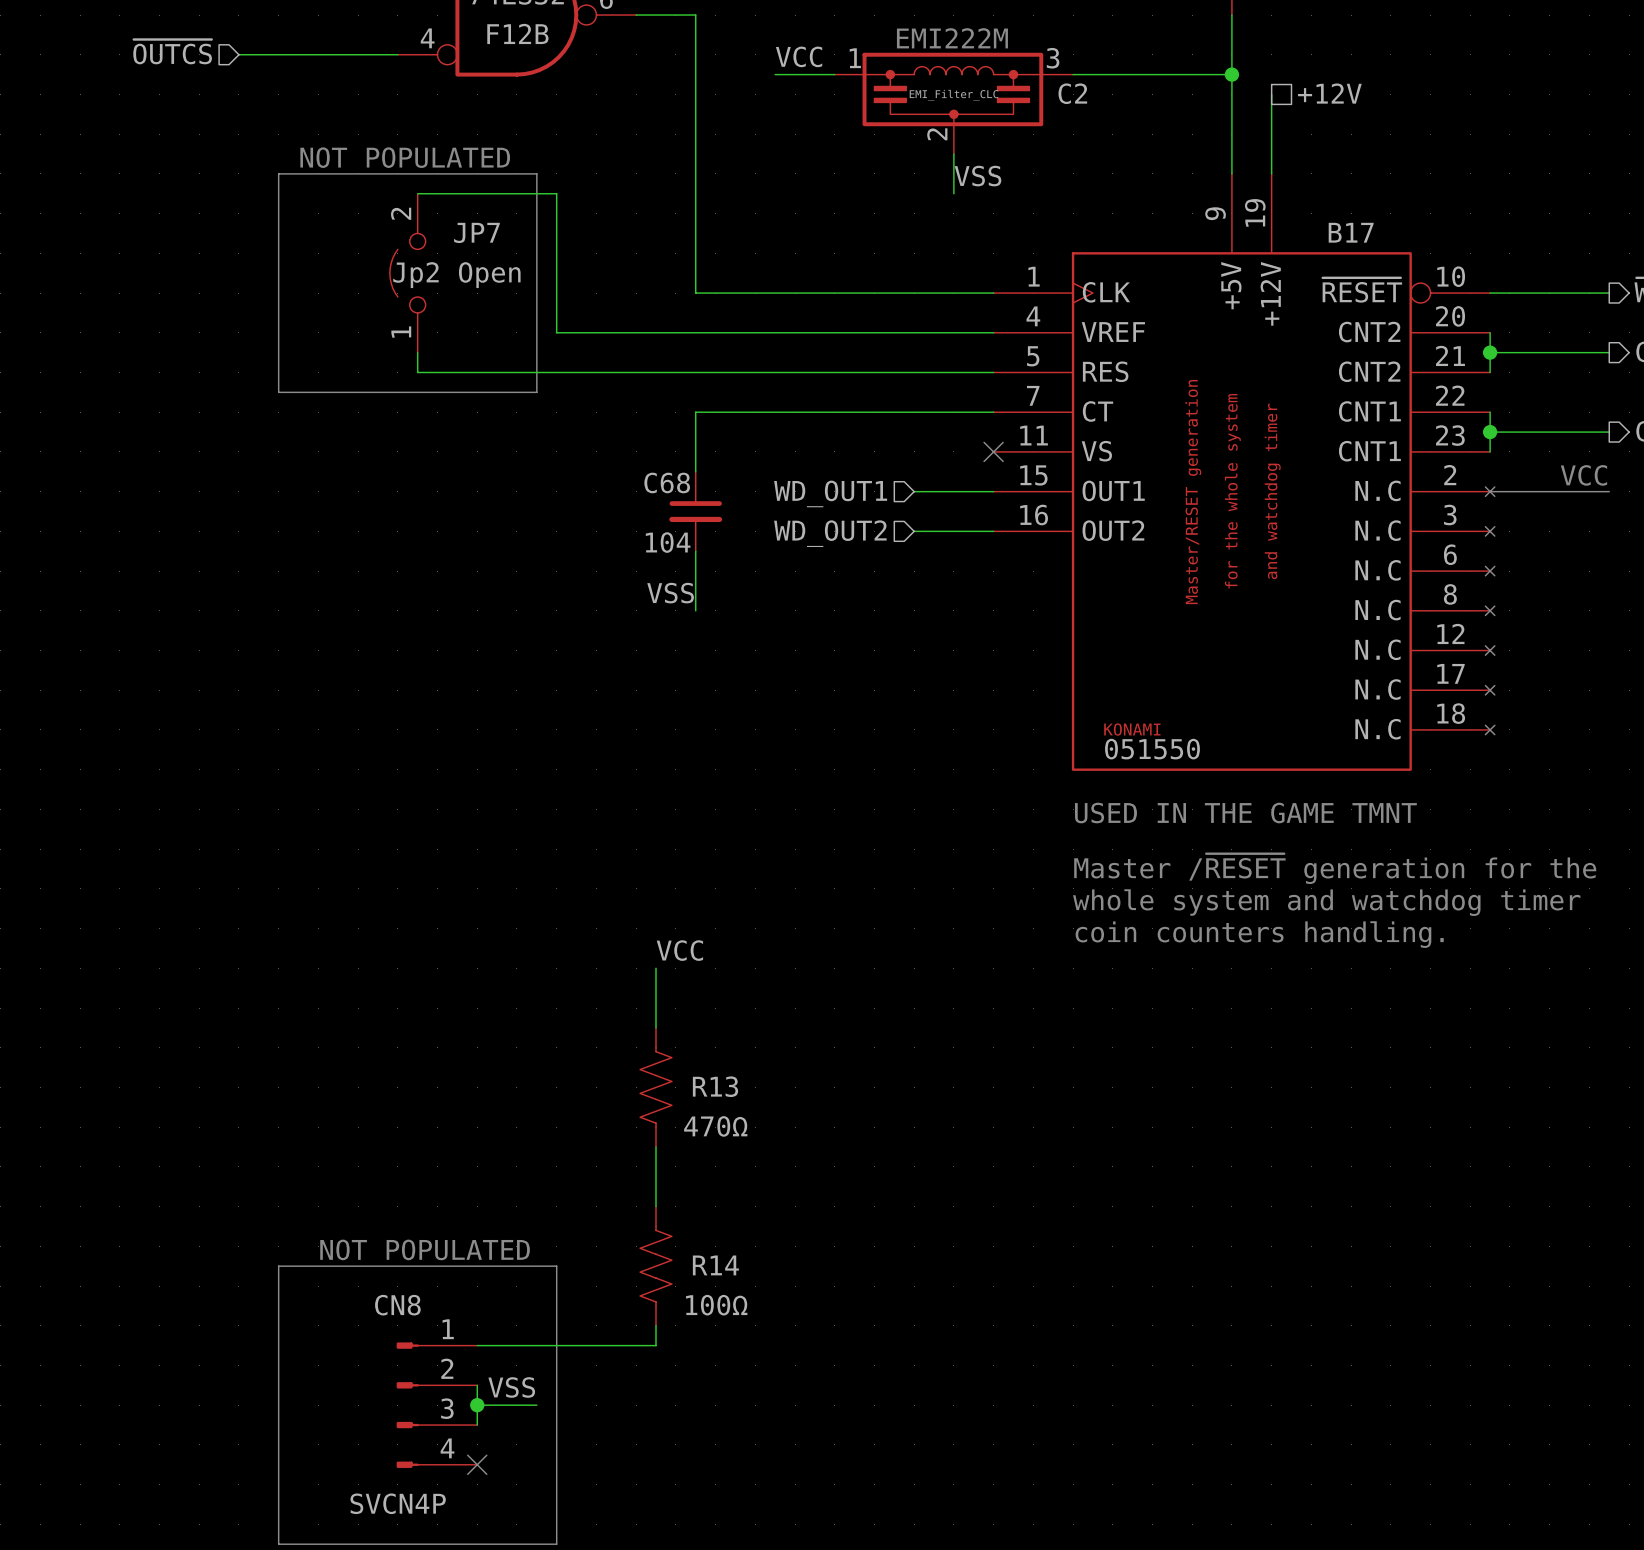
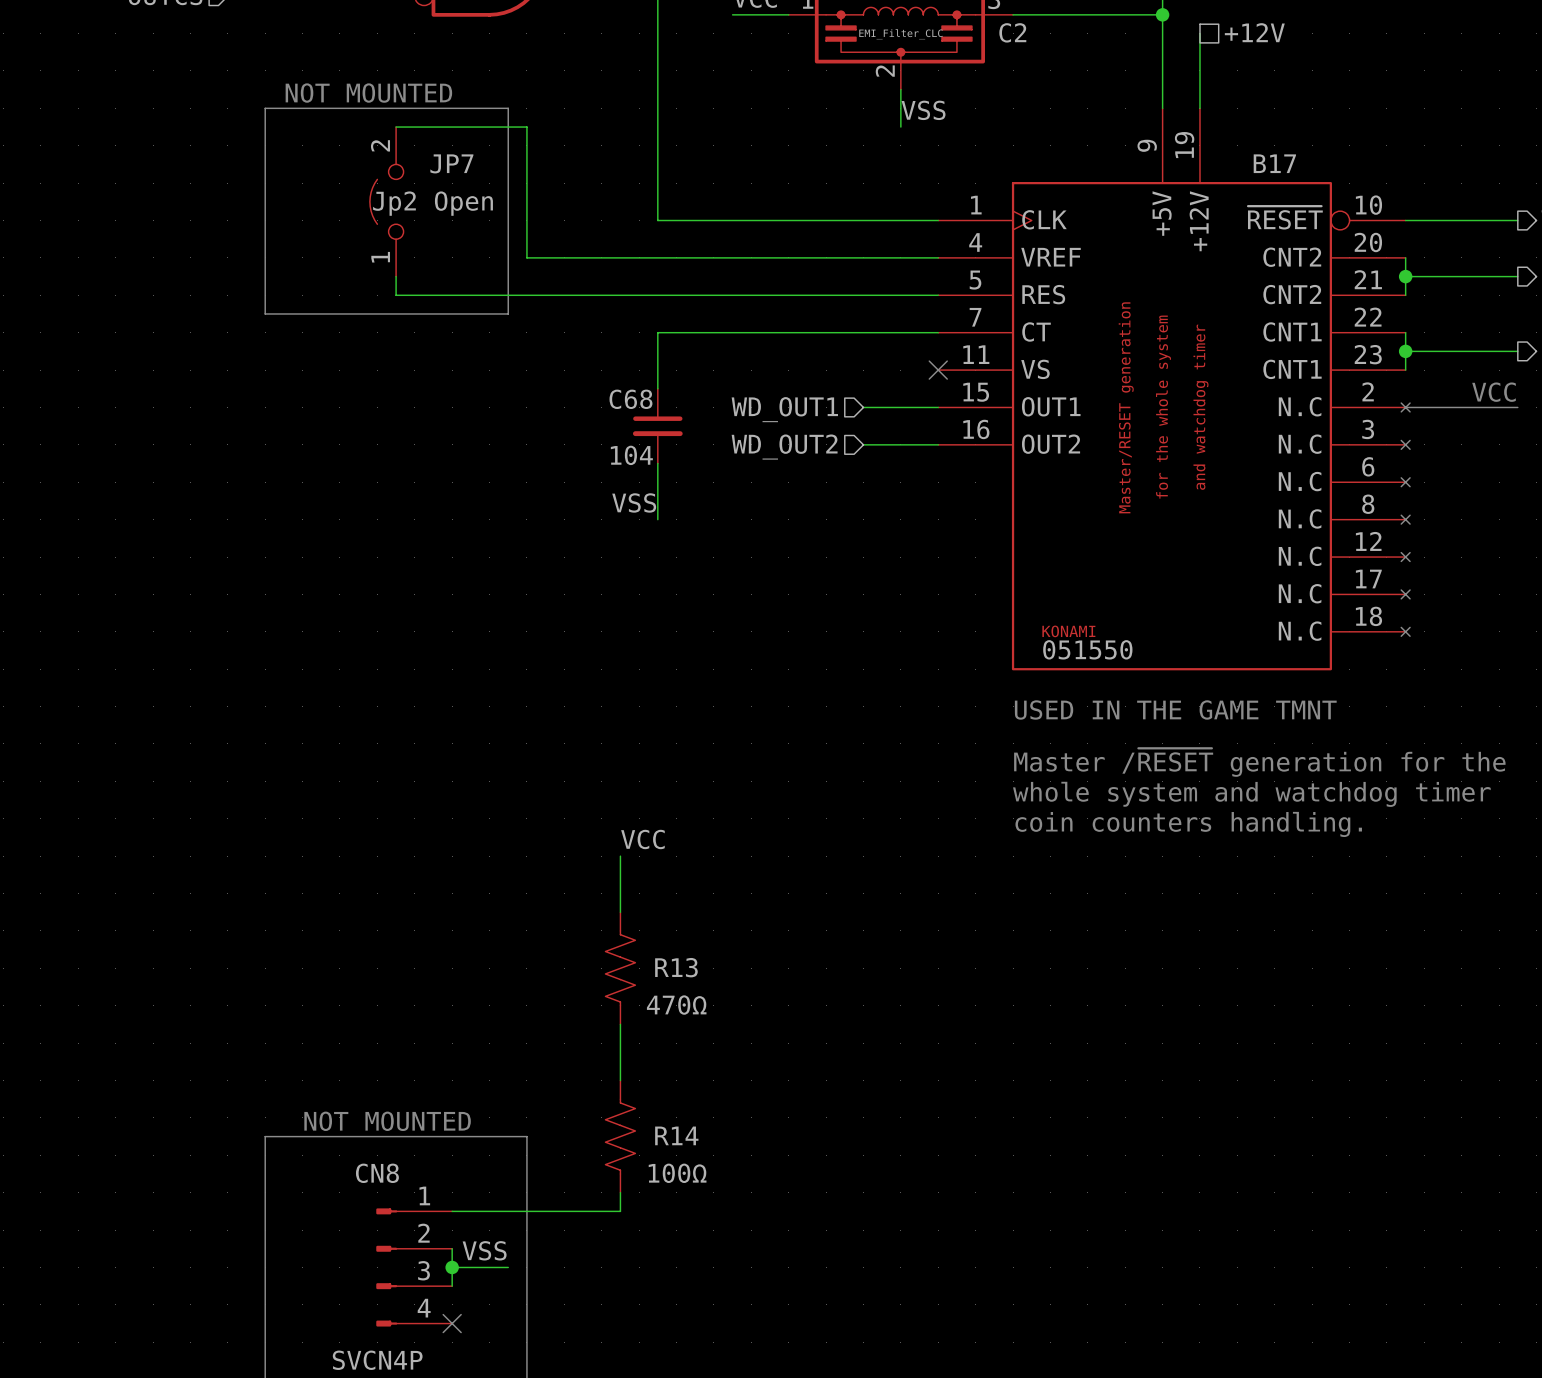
text: NOT POPULATED (405, 157) -> NOT MOUNTED (368, 93)
text: NOT POPULATED (425, 1249) -> NOT MOUNTED (387, 1121)

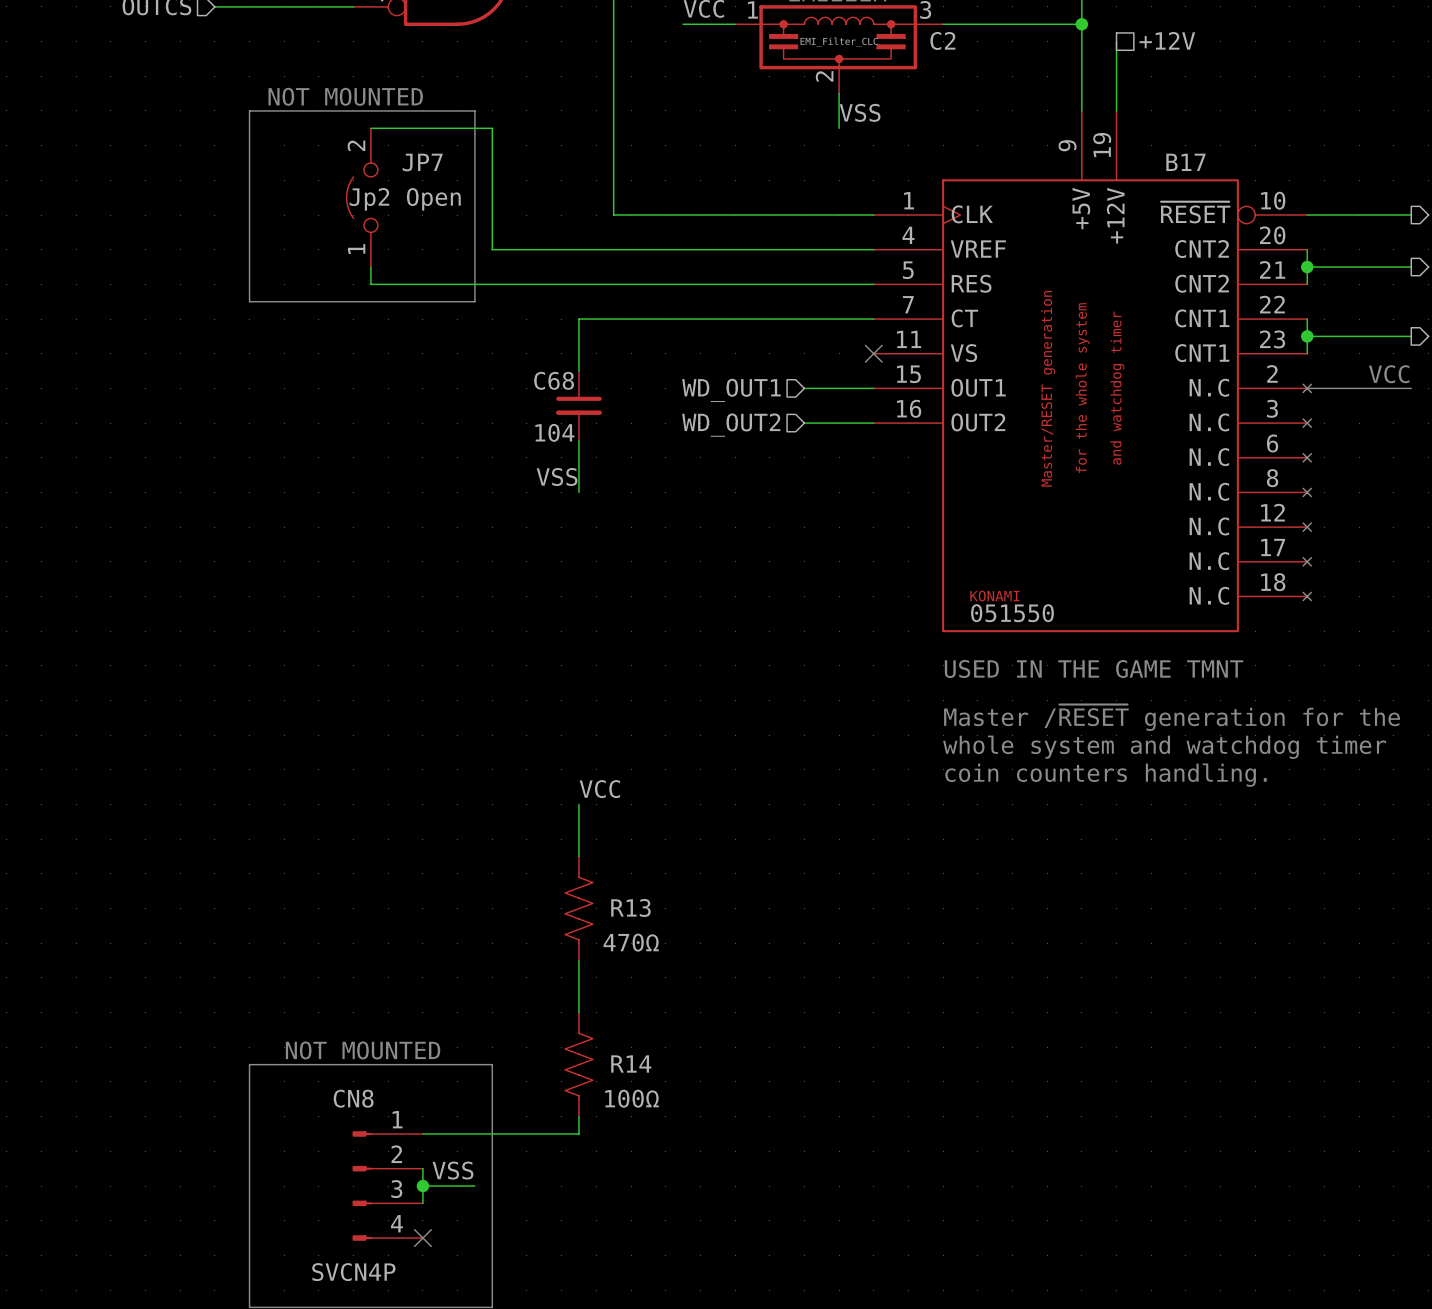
wire: (657, 332) (657, 388) -> (613, 319) (578, 319) (578, 371)
C68 position: (657, 426) -> (578, 405)
wire: (657, 463) (657, 519) -> (578, 440) (578, 492)
label position: VSS (634, 502) -> VSS (557, 476)

